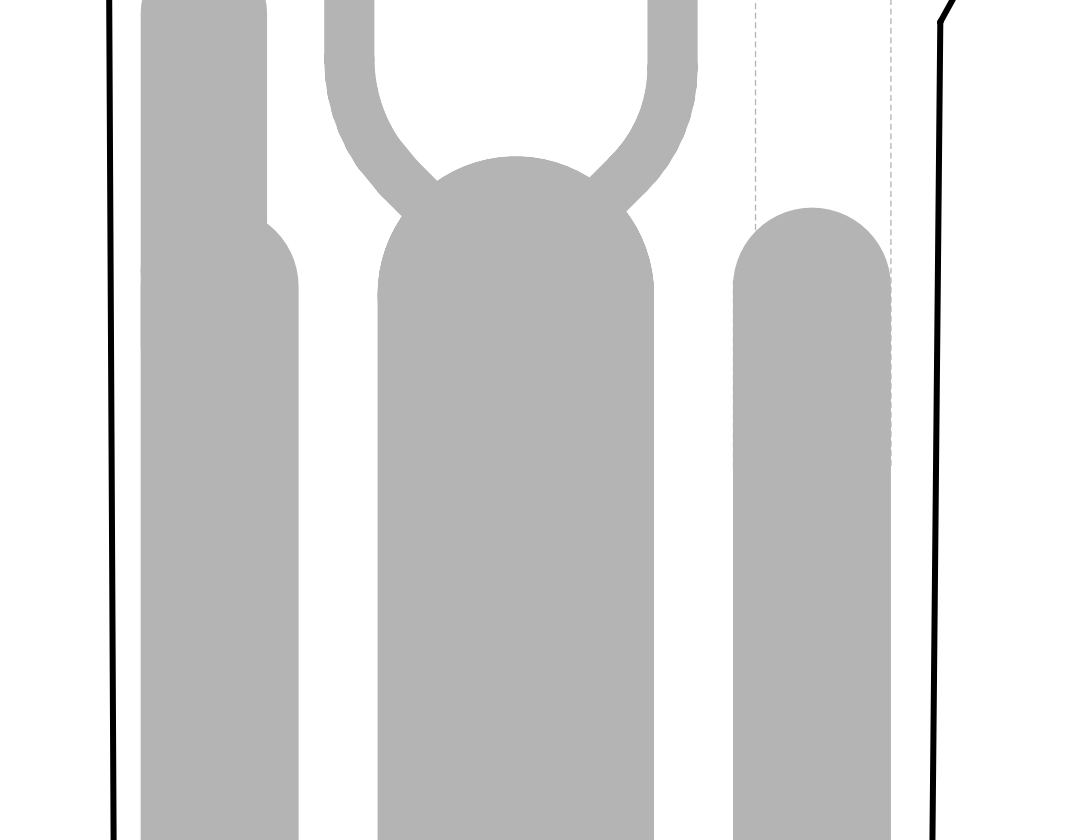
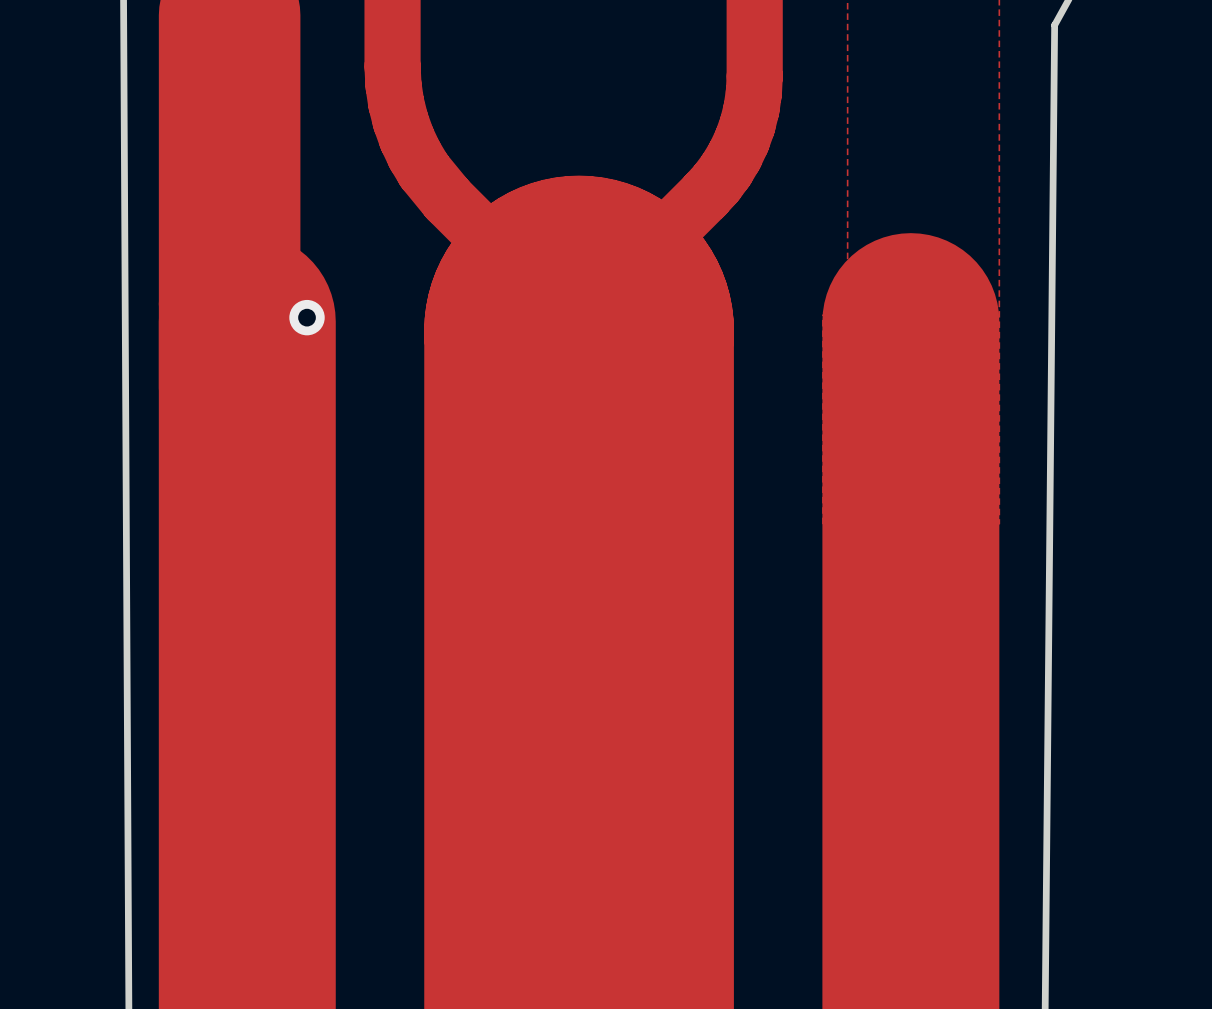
via: none -> (307, 317)

